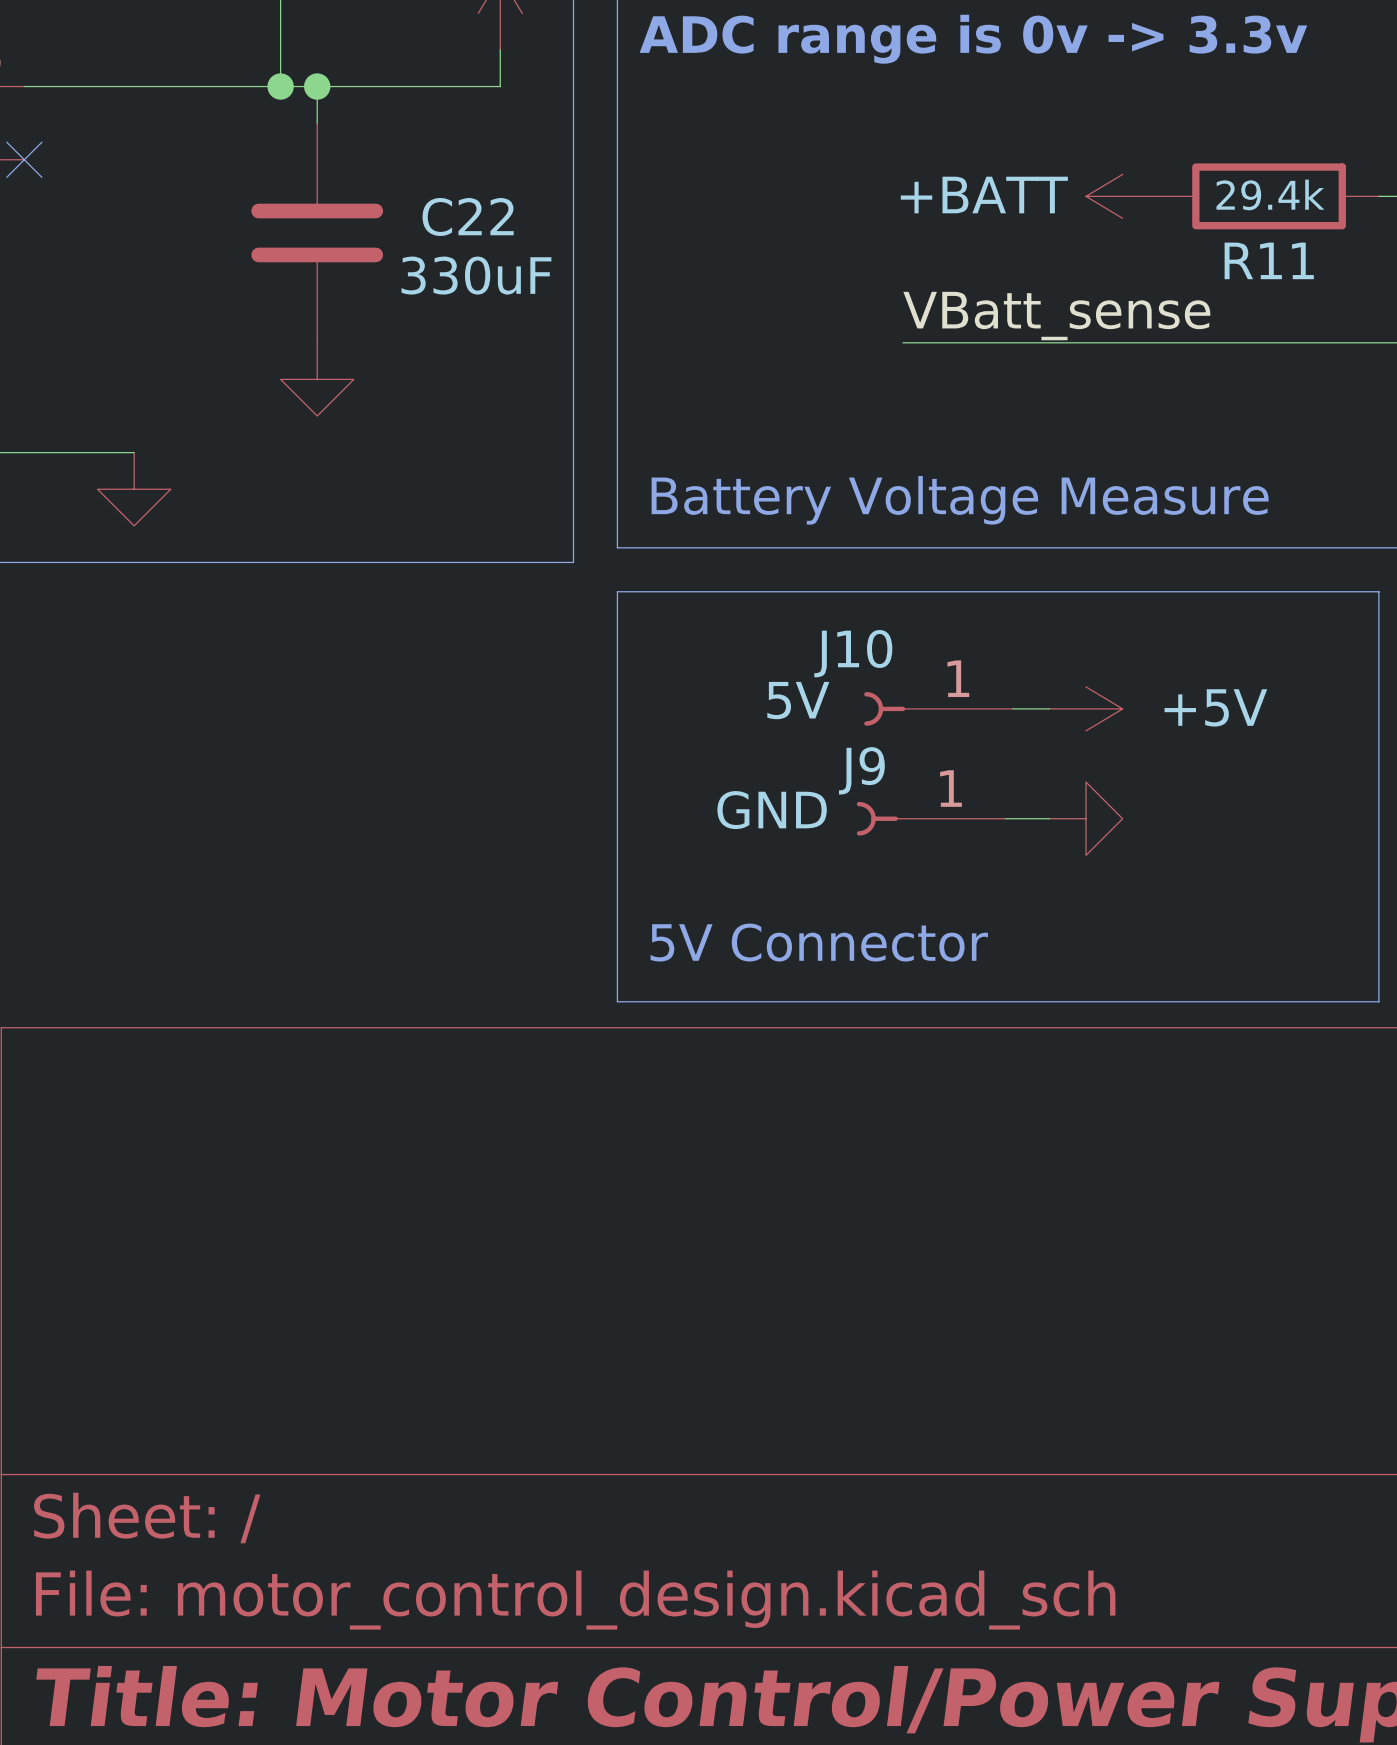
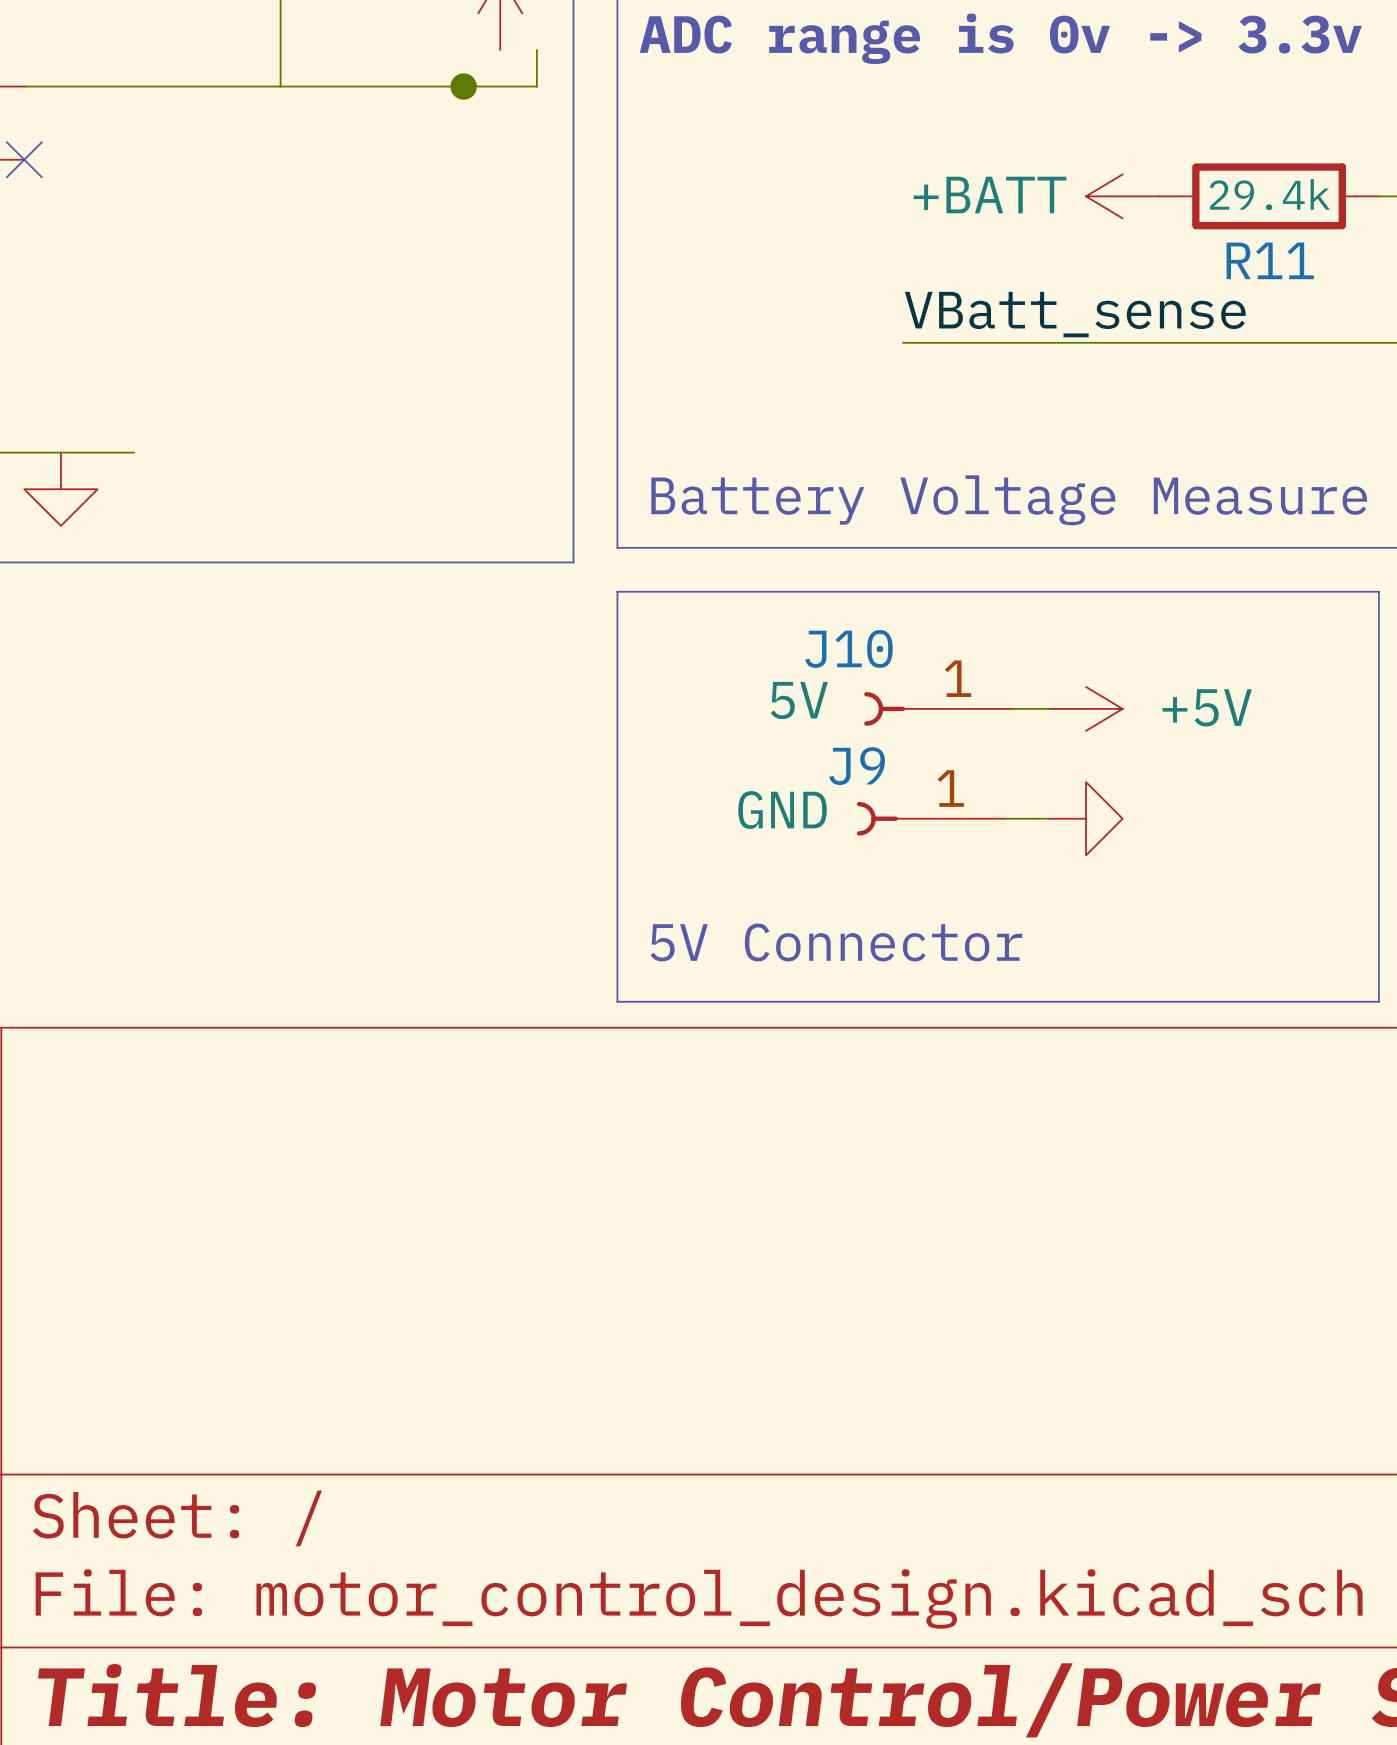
wire: (500, 49) (500, 86) -> (536, 49) (536, 86) (500, 86)
junction: (280, 86) -> none
wire: (317, 86) (317, 123) -> none
junction: (317, 86) -> none
junction: none -> (463, 86)
C22: 330uF (317, 232) -> none
power symbol: (317, 379) -> none
power symbol position: (134, 489) -> (60, 489)

